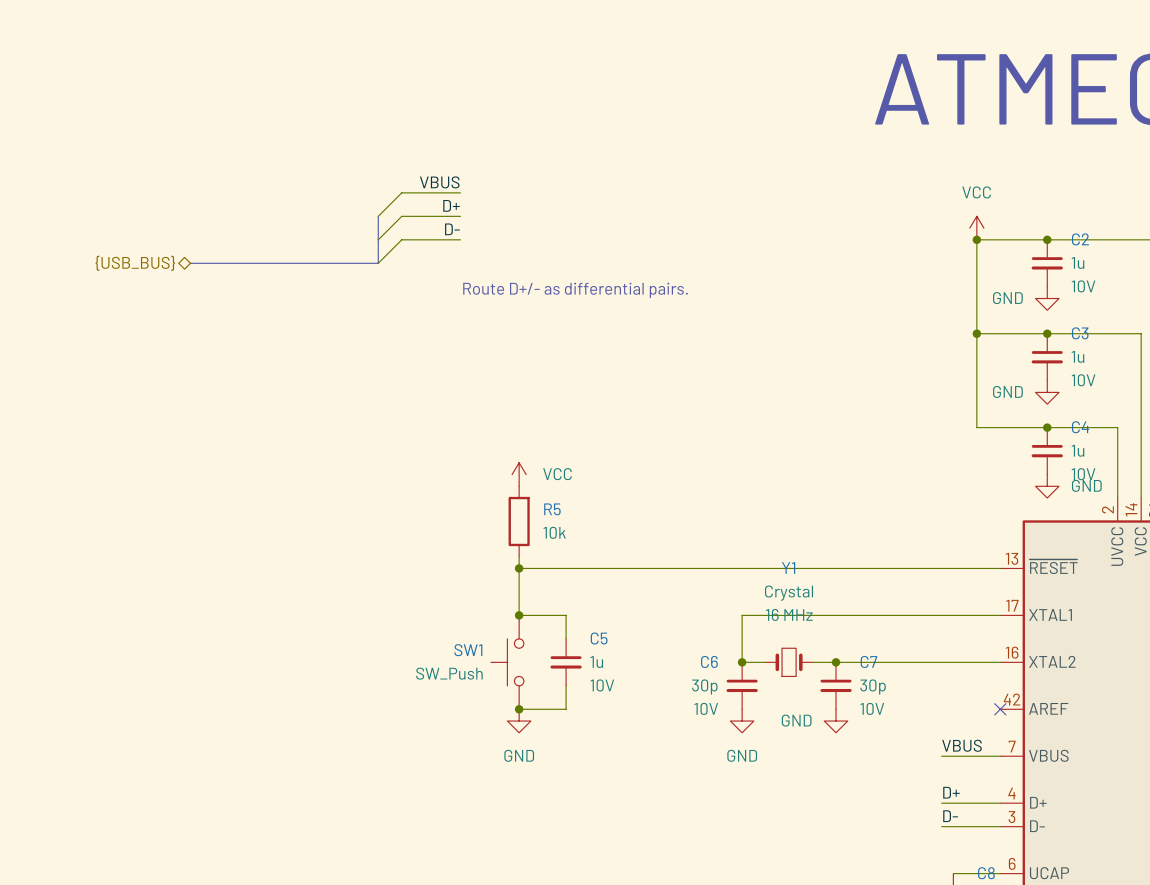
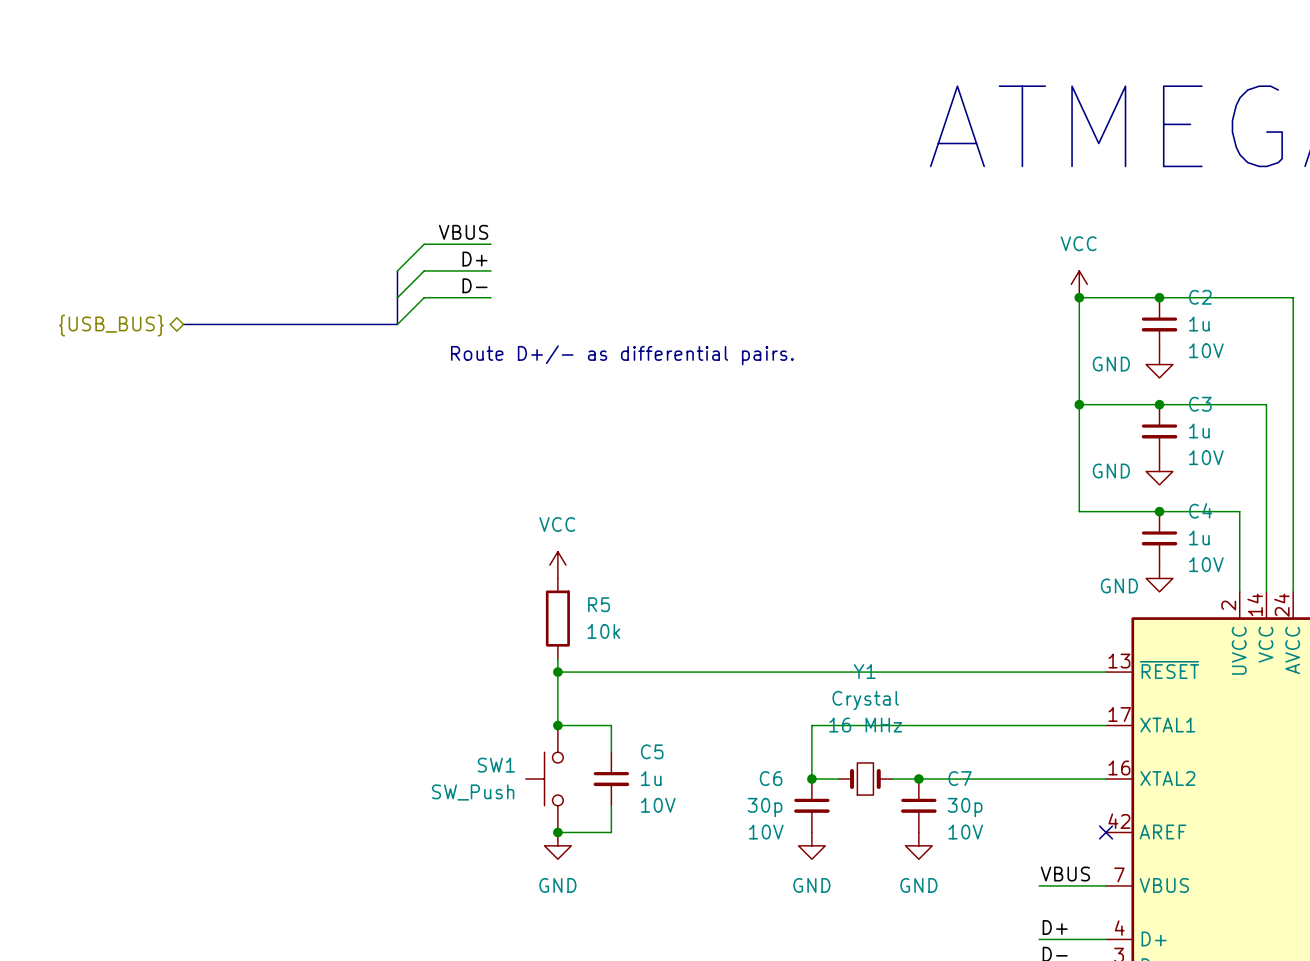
power symbol text position: VCC (557, 474) -> VCC (557, 524)
power symbol text position: GND (1086, 485) -> GND (1119, 585)
power symbol text position: GND (796, 720) -> GND (918, 885)

